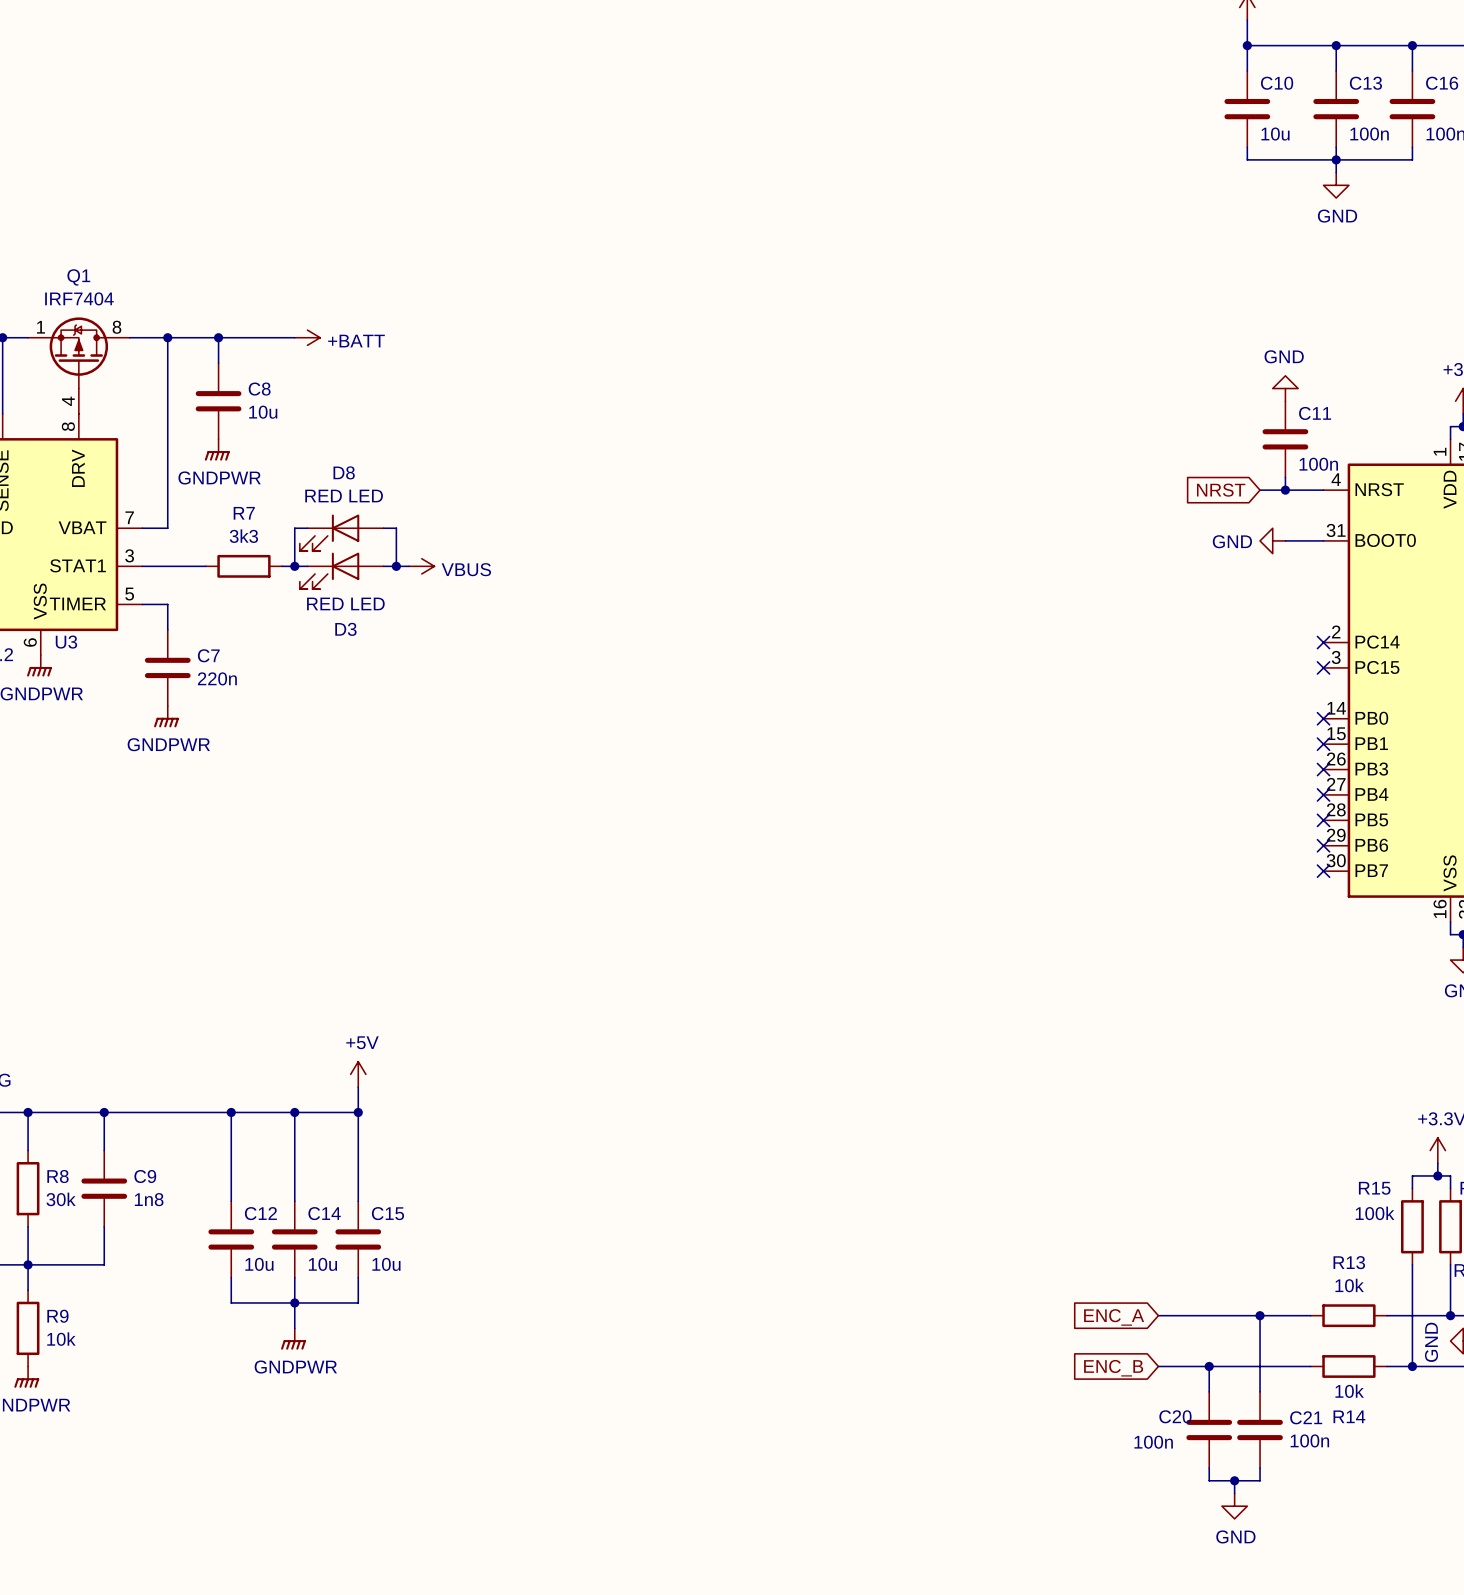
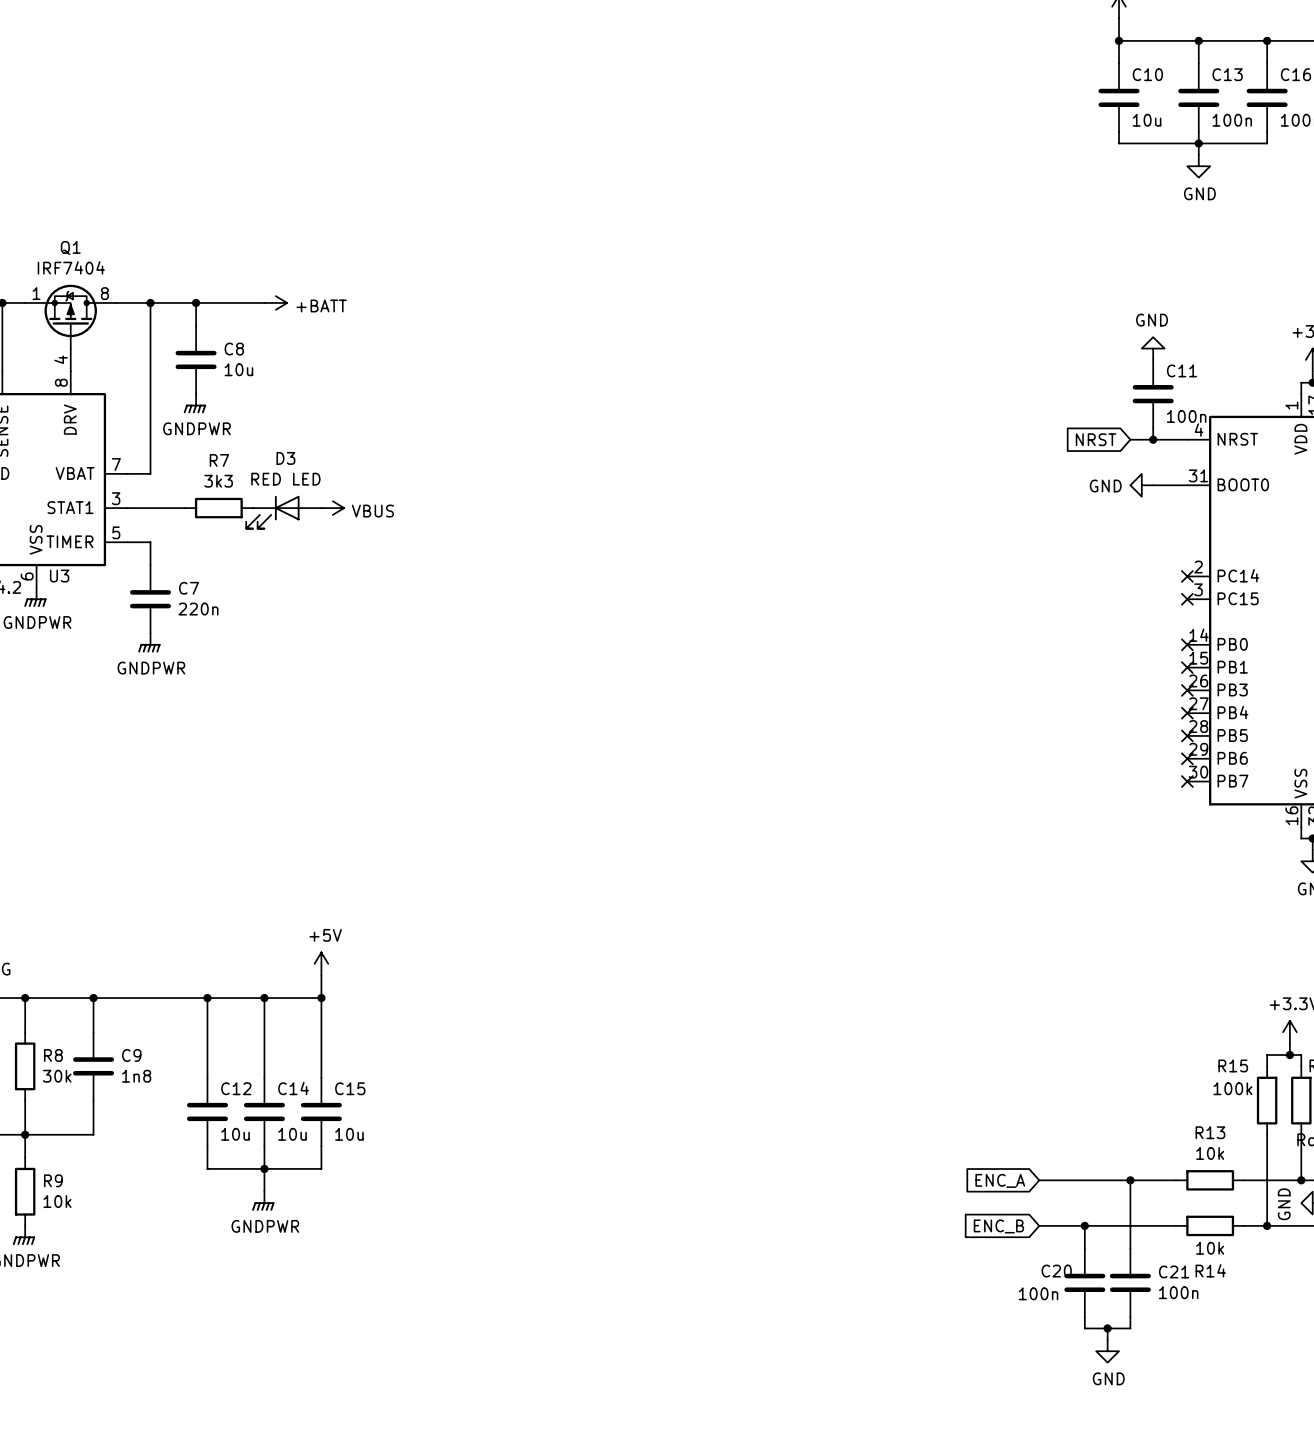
wire: (307, 528) (294, 528) (294, 566) -> none
wire: (383, 528) (396, 528) (396, 566) -> none
D8: RED LED (341, 532) -> none
junction: (294, 566) -> none
wire: (383, 566) (409, 566) -> none
junction: (396, 566) -> none
power symbol position: VBUS (421, 566) -> VBUS (332, 508)
D3 position: (341, 570) -> (283, 512)
D3 value position: RED LED (345, 603) -> RED LED (285, 479)
D3 name position: D3 (345, 629) -> D3 (285, 458)

